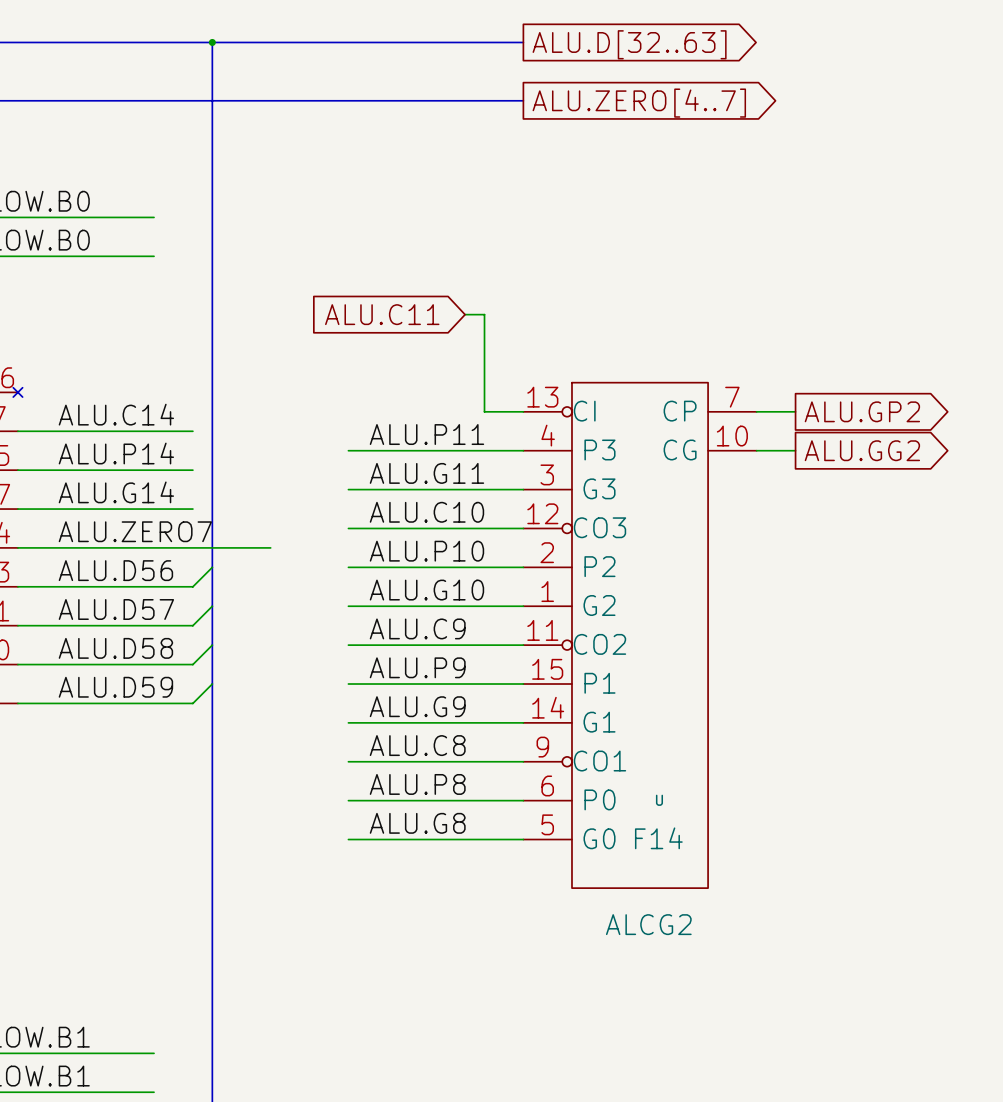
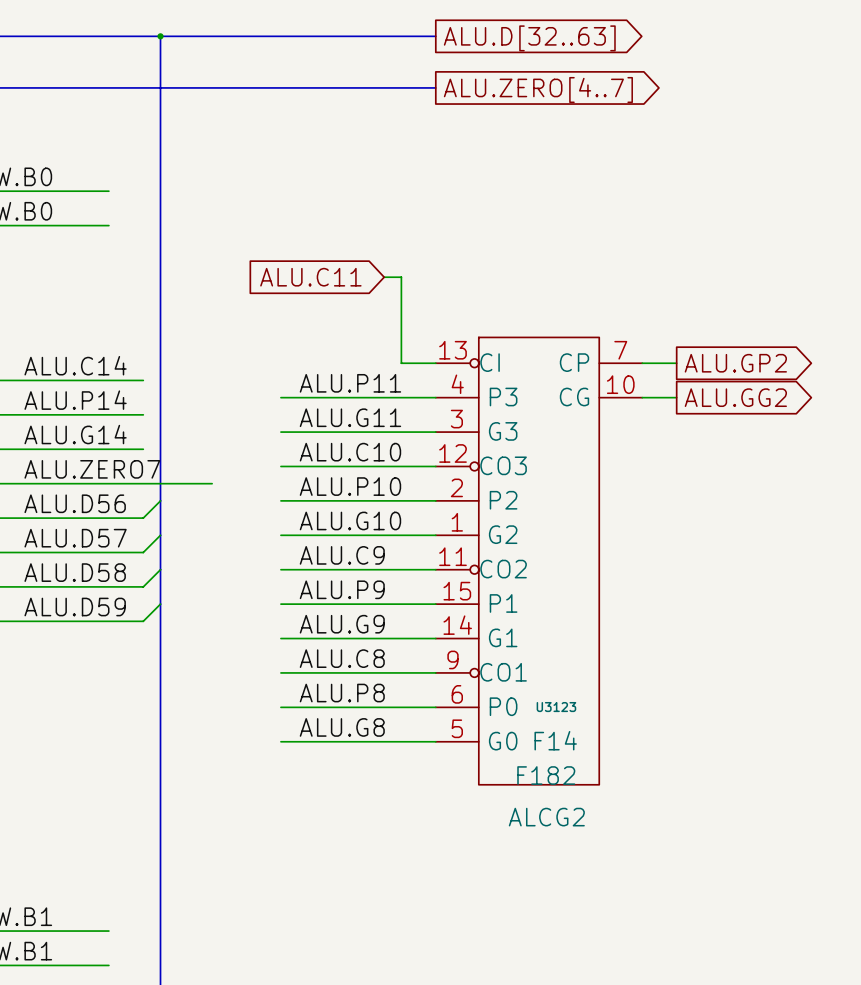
U name: U (659, 800) -> U3123 (556, 707)
U value: none -> F182 (546, 775)

